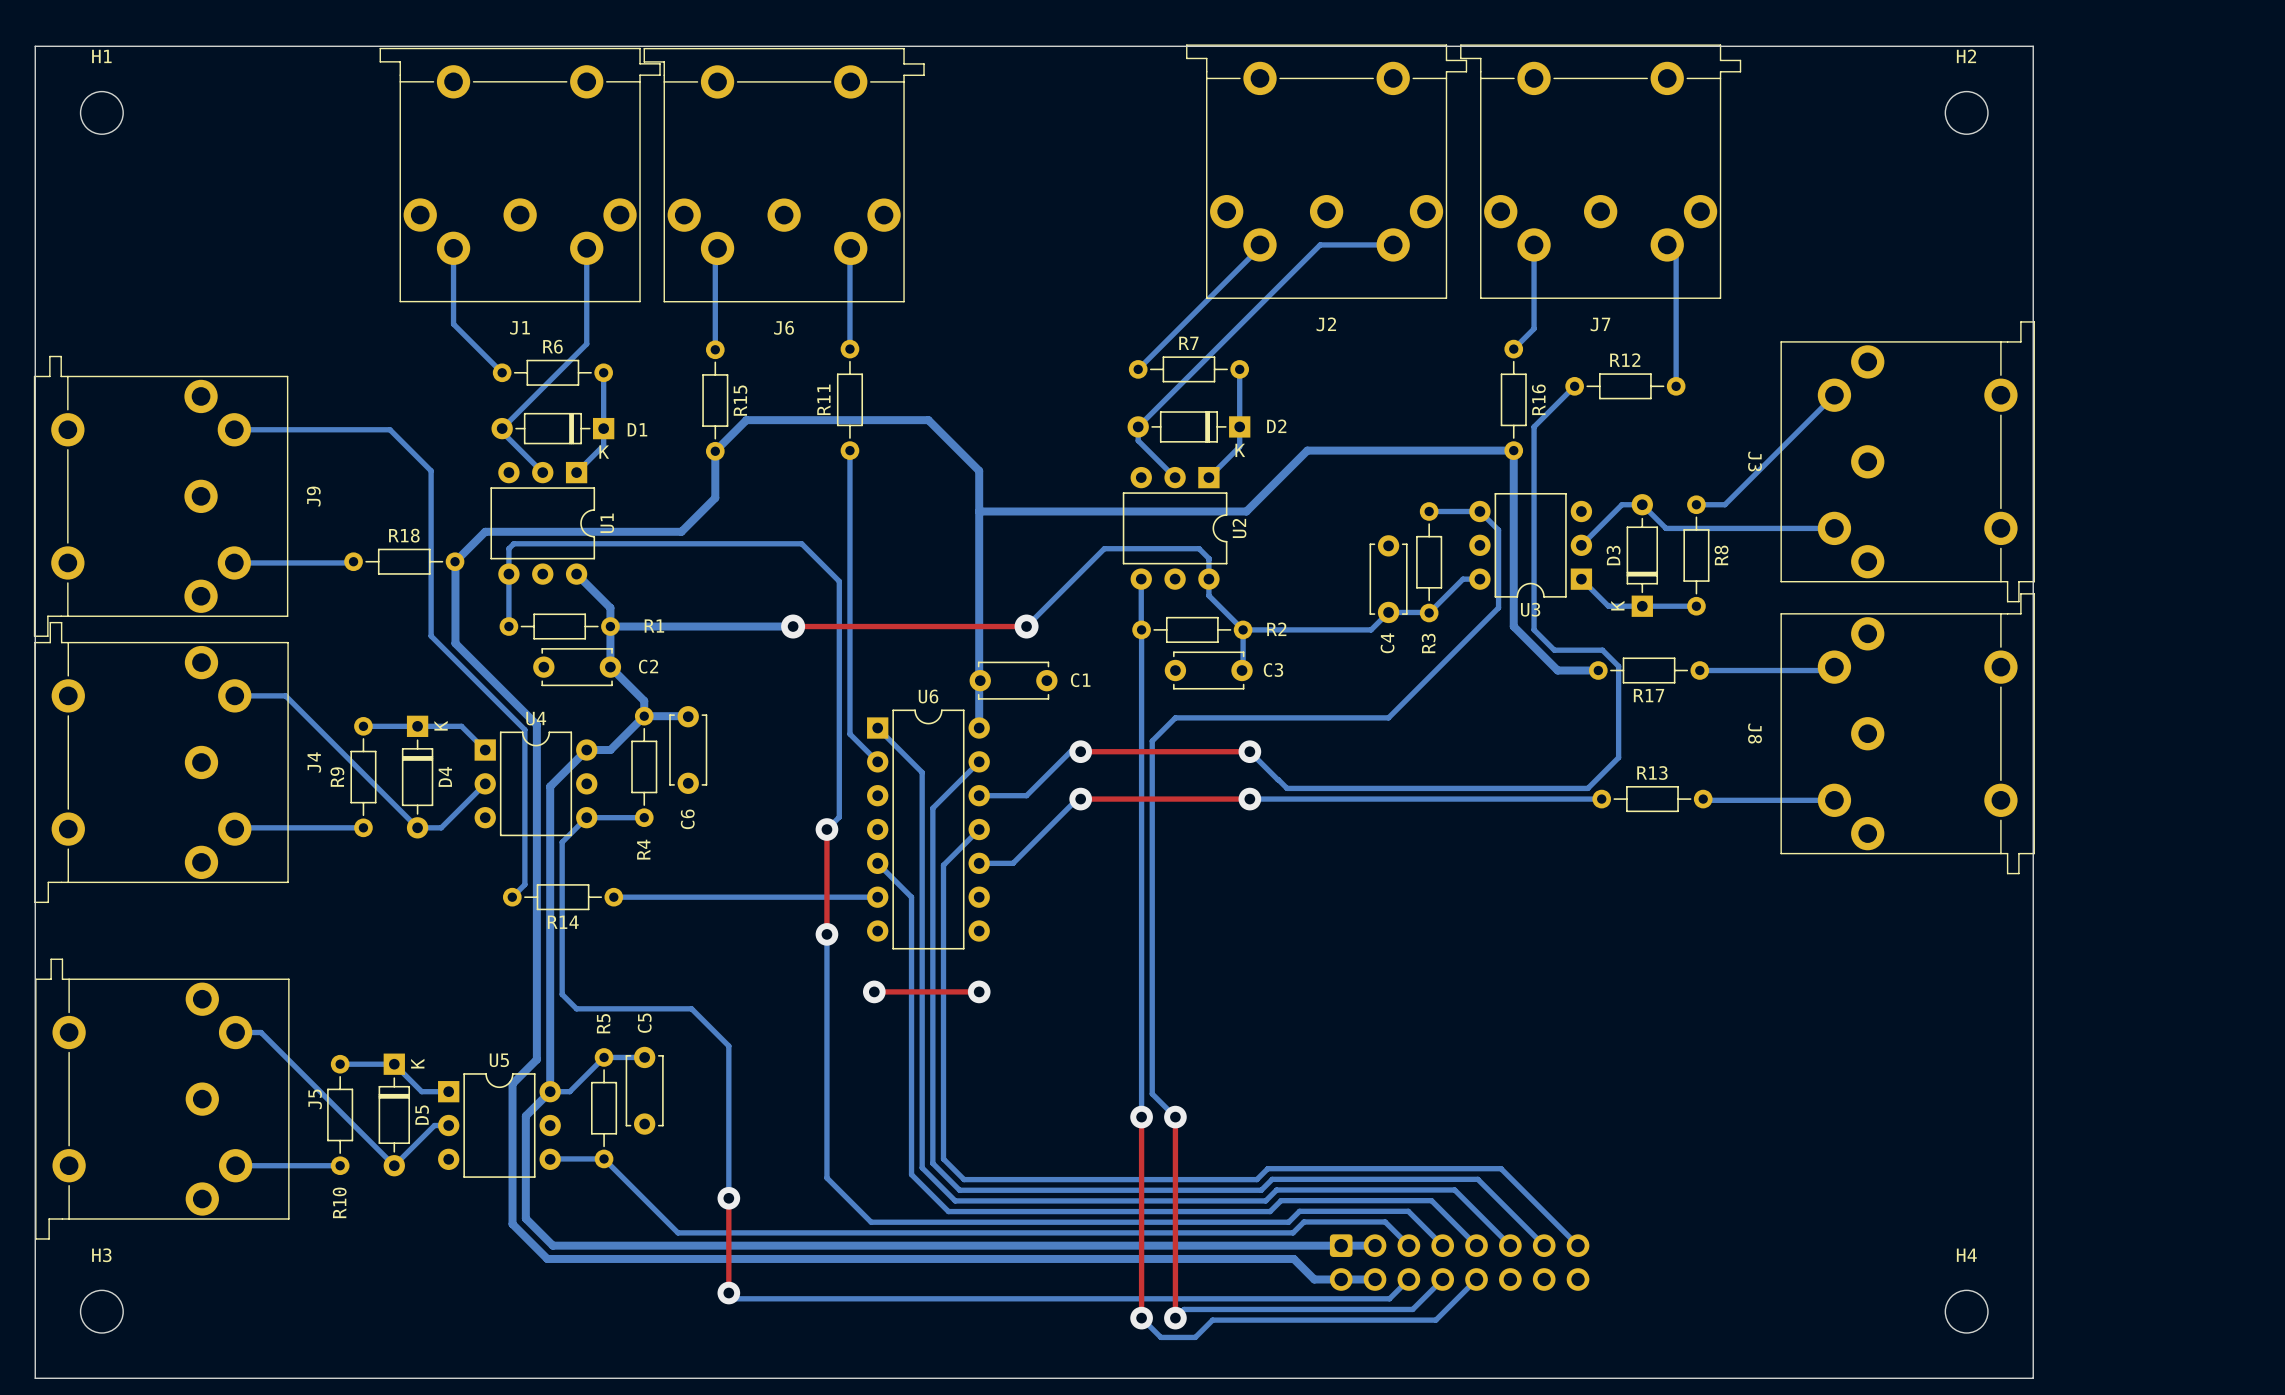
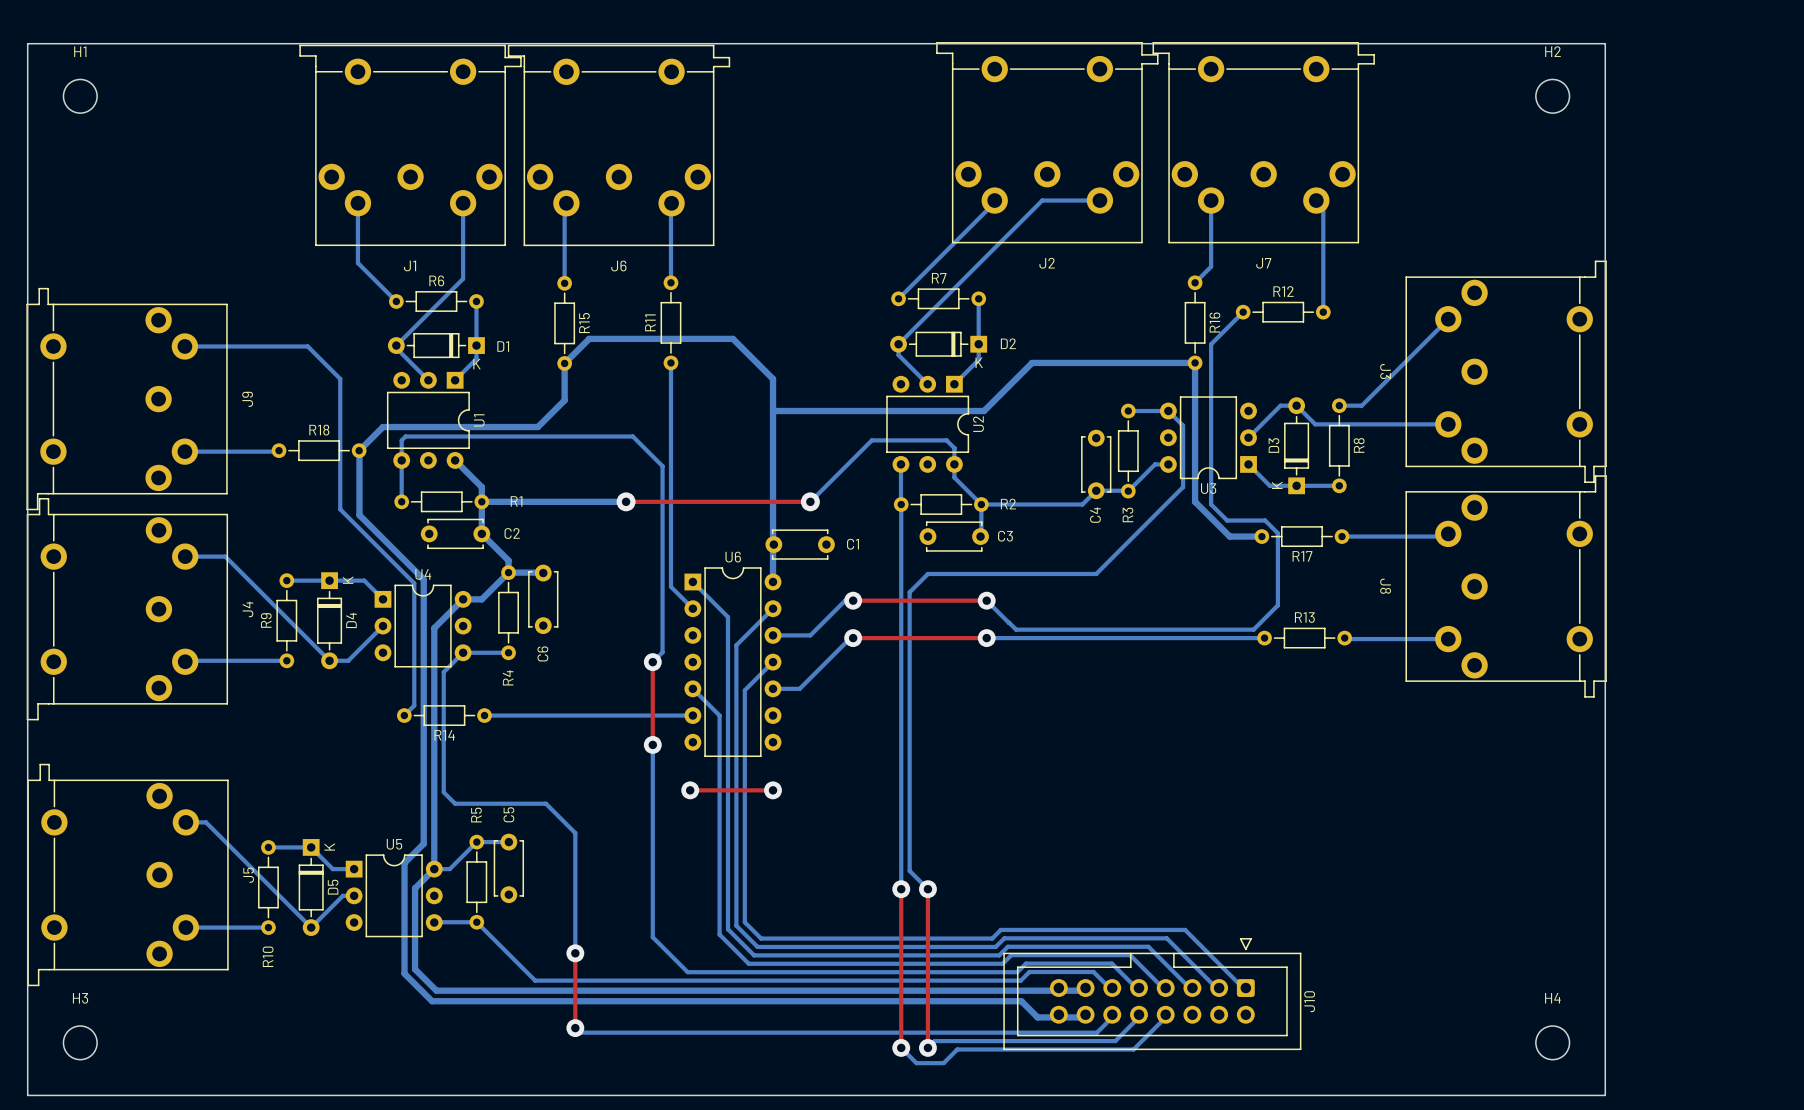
J10 side: bottom (1459, 1262) -> top (1152, 994)

